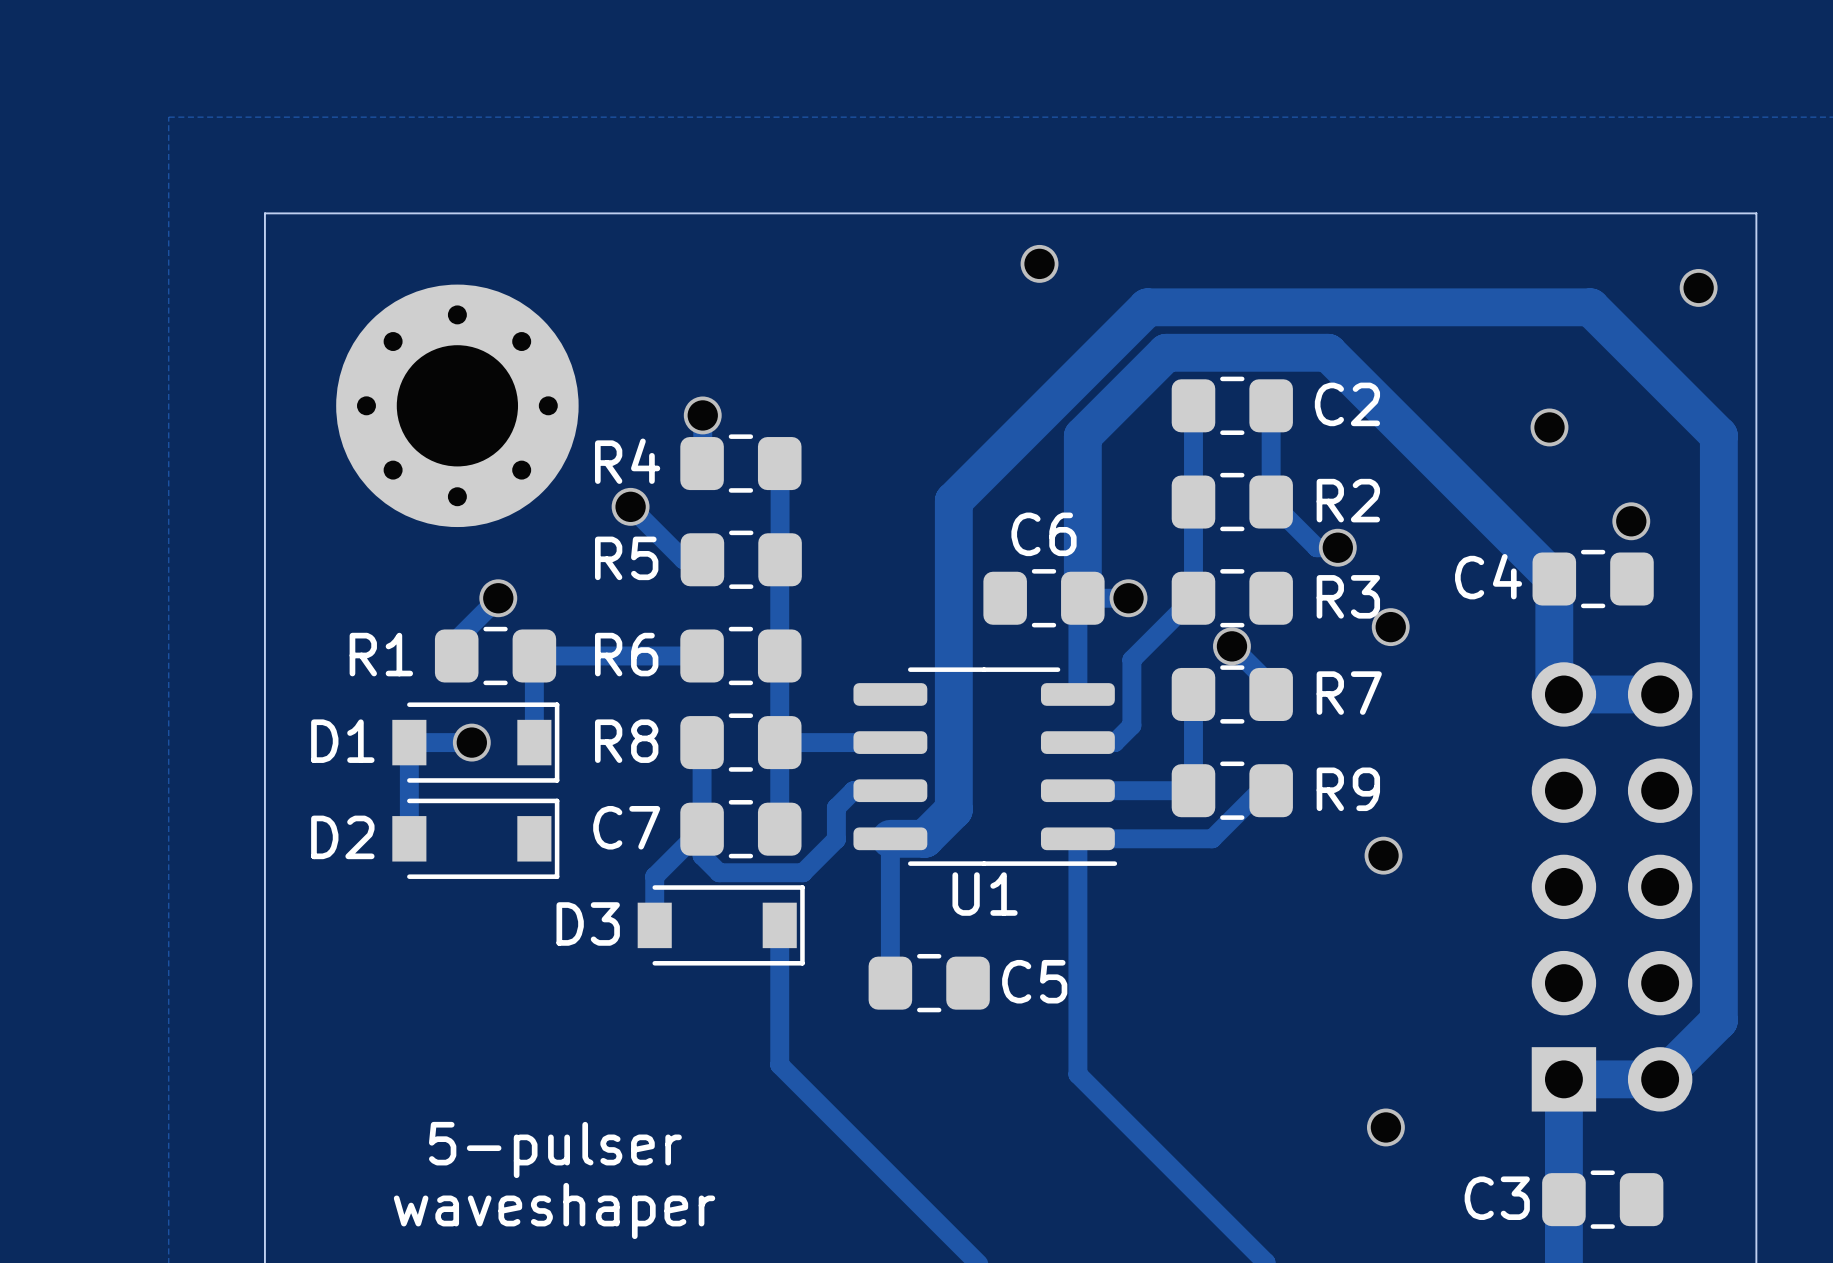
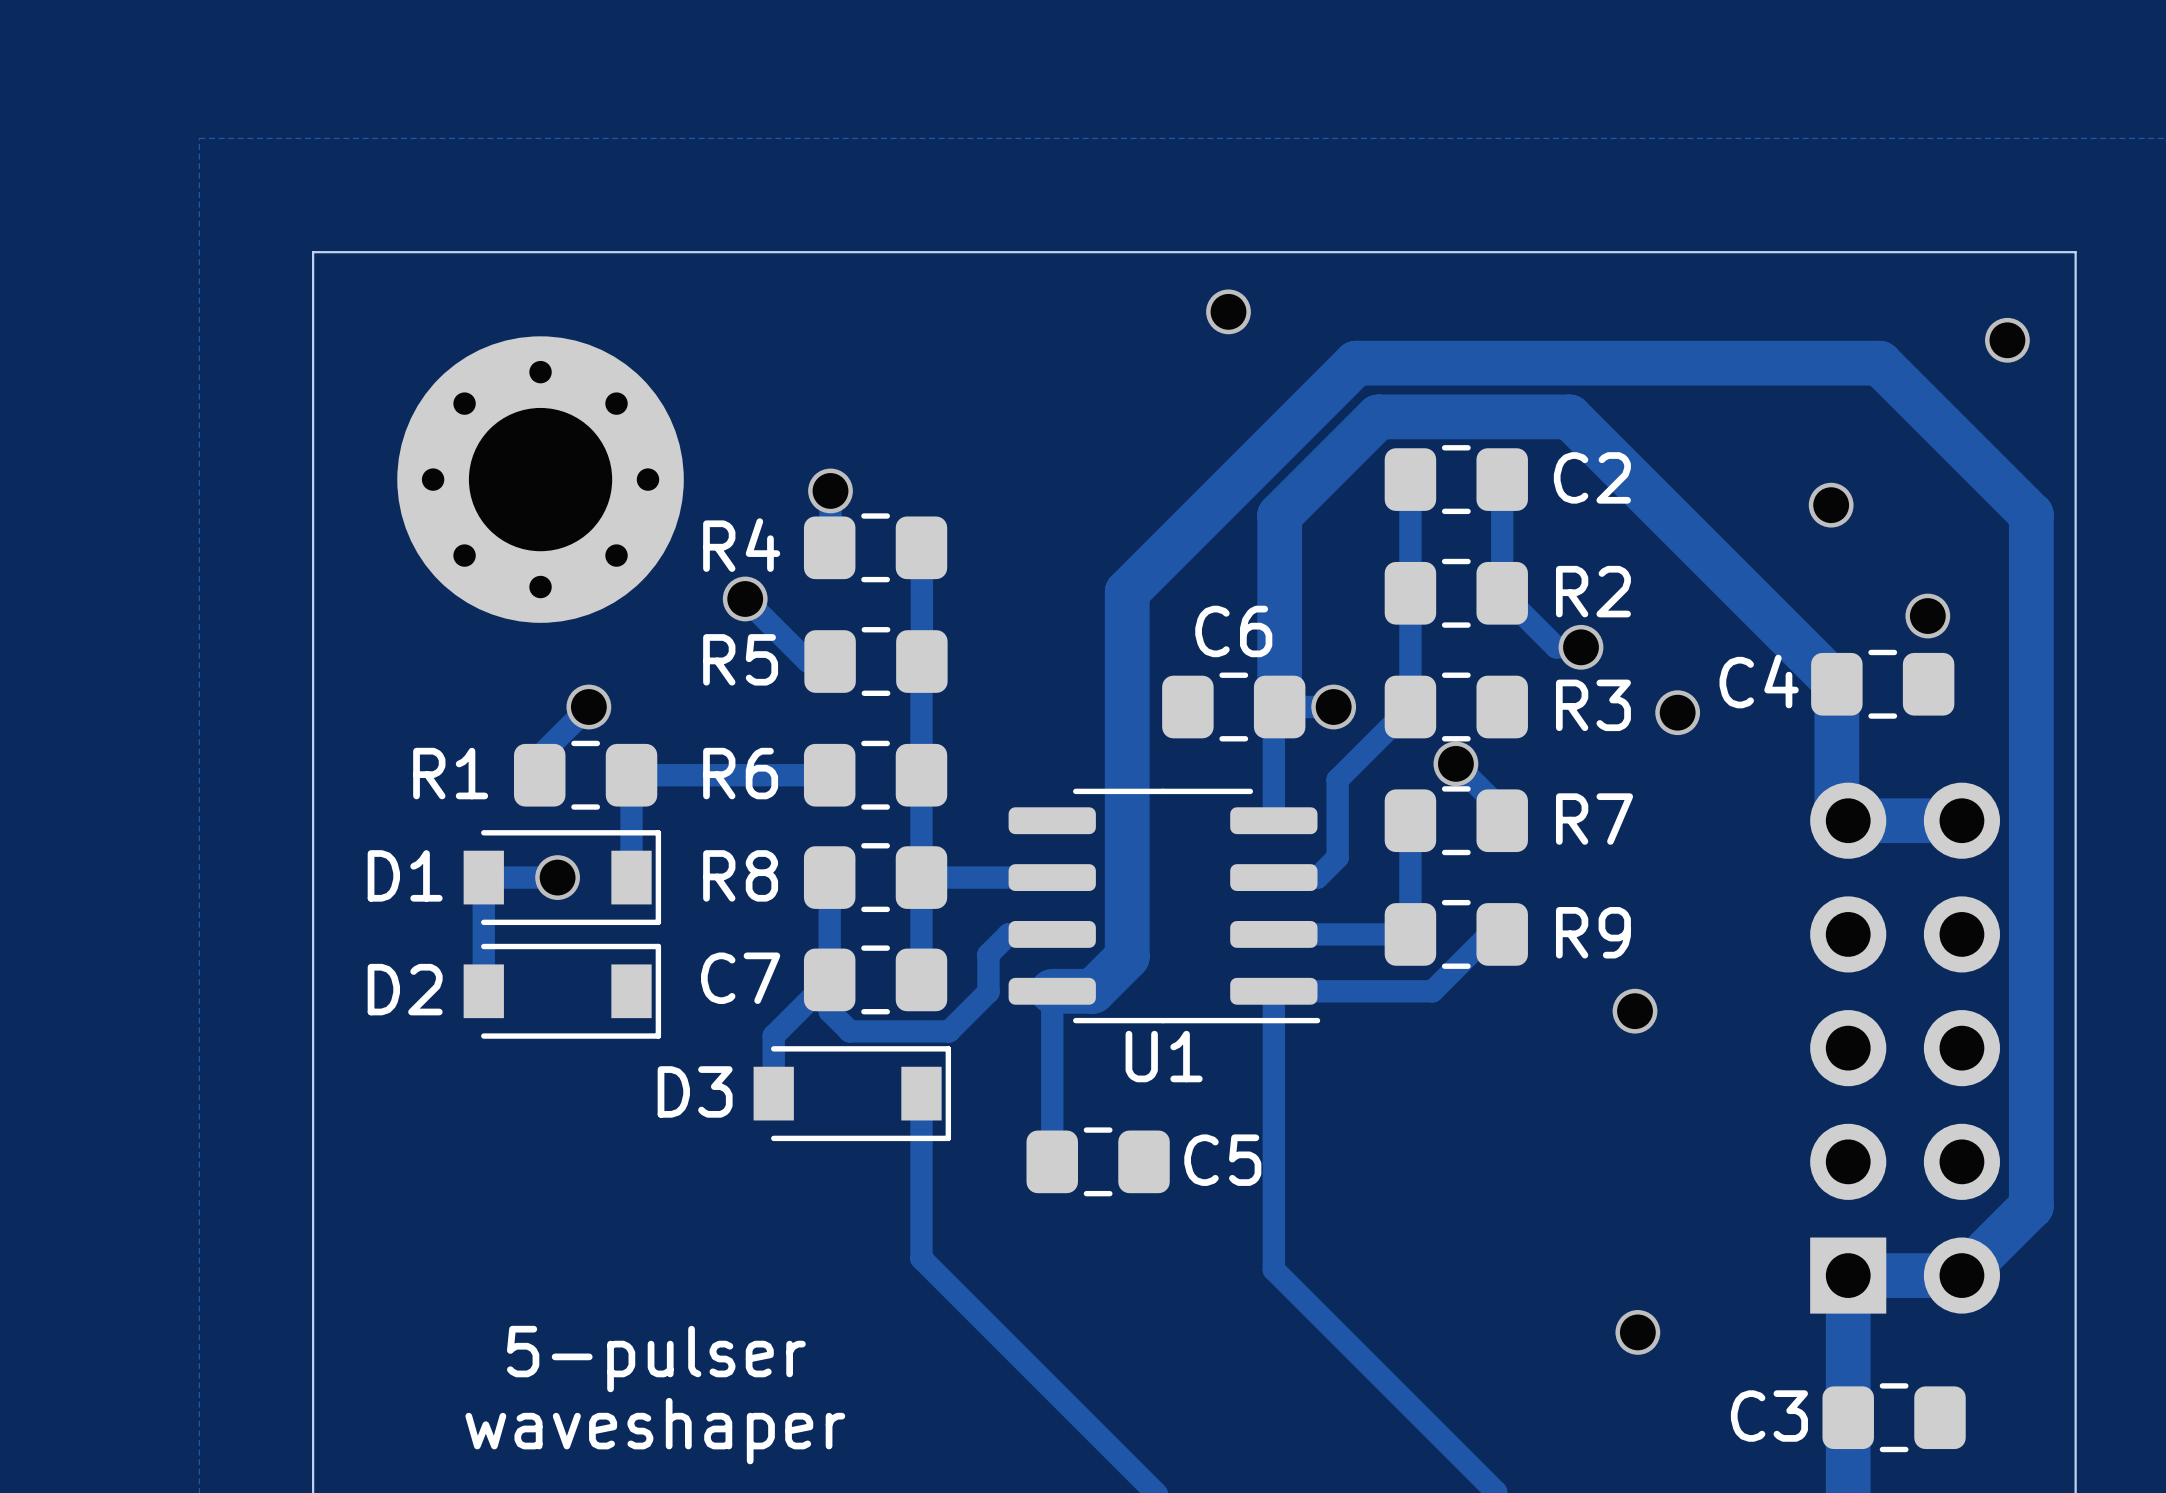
via position: (1390, 627) -> (1677, 712)

